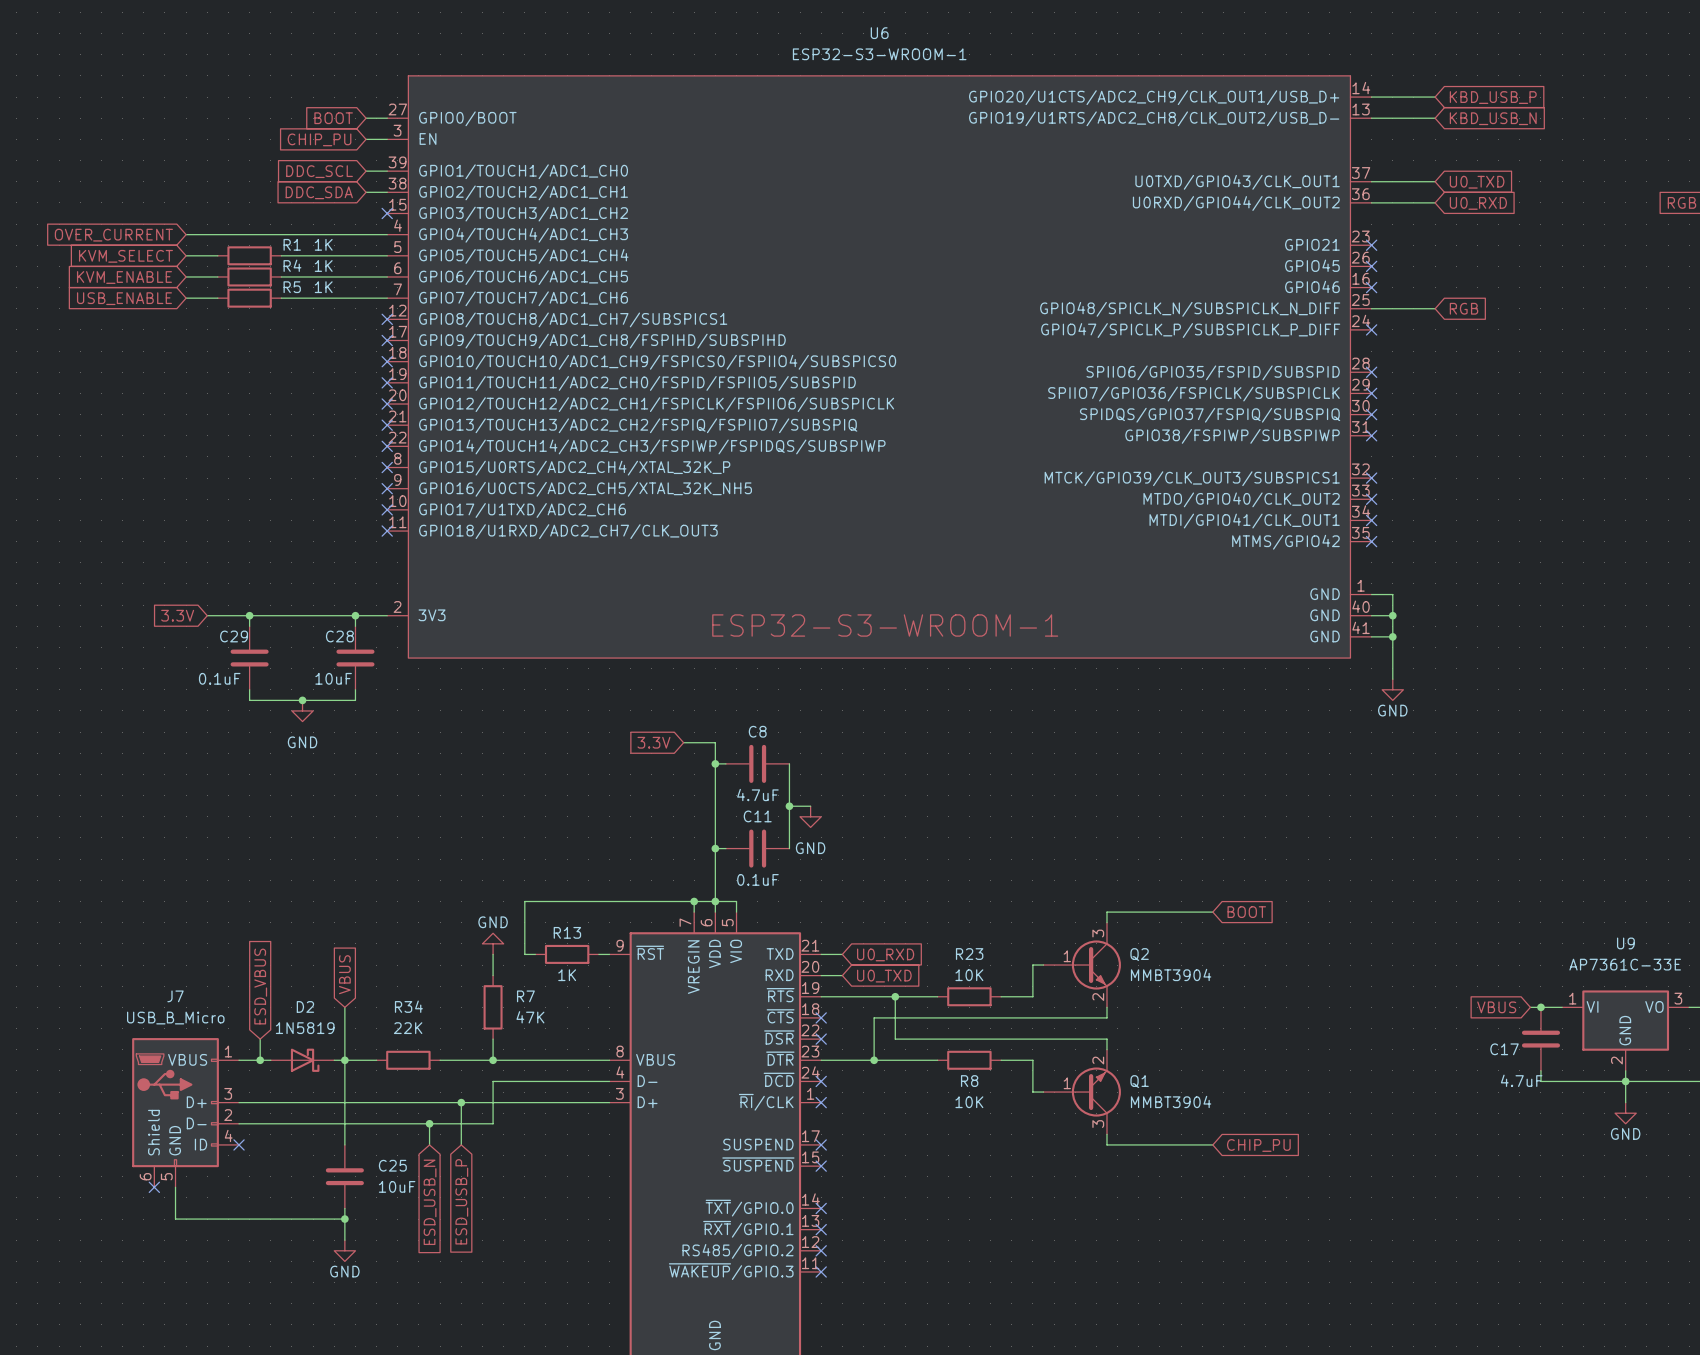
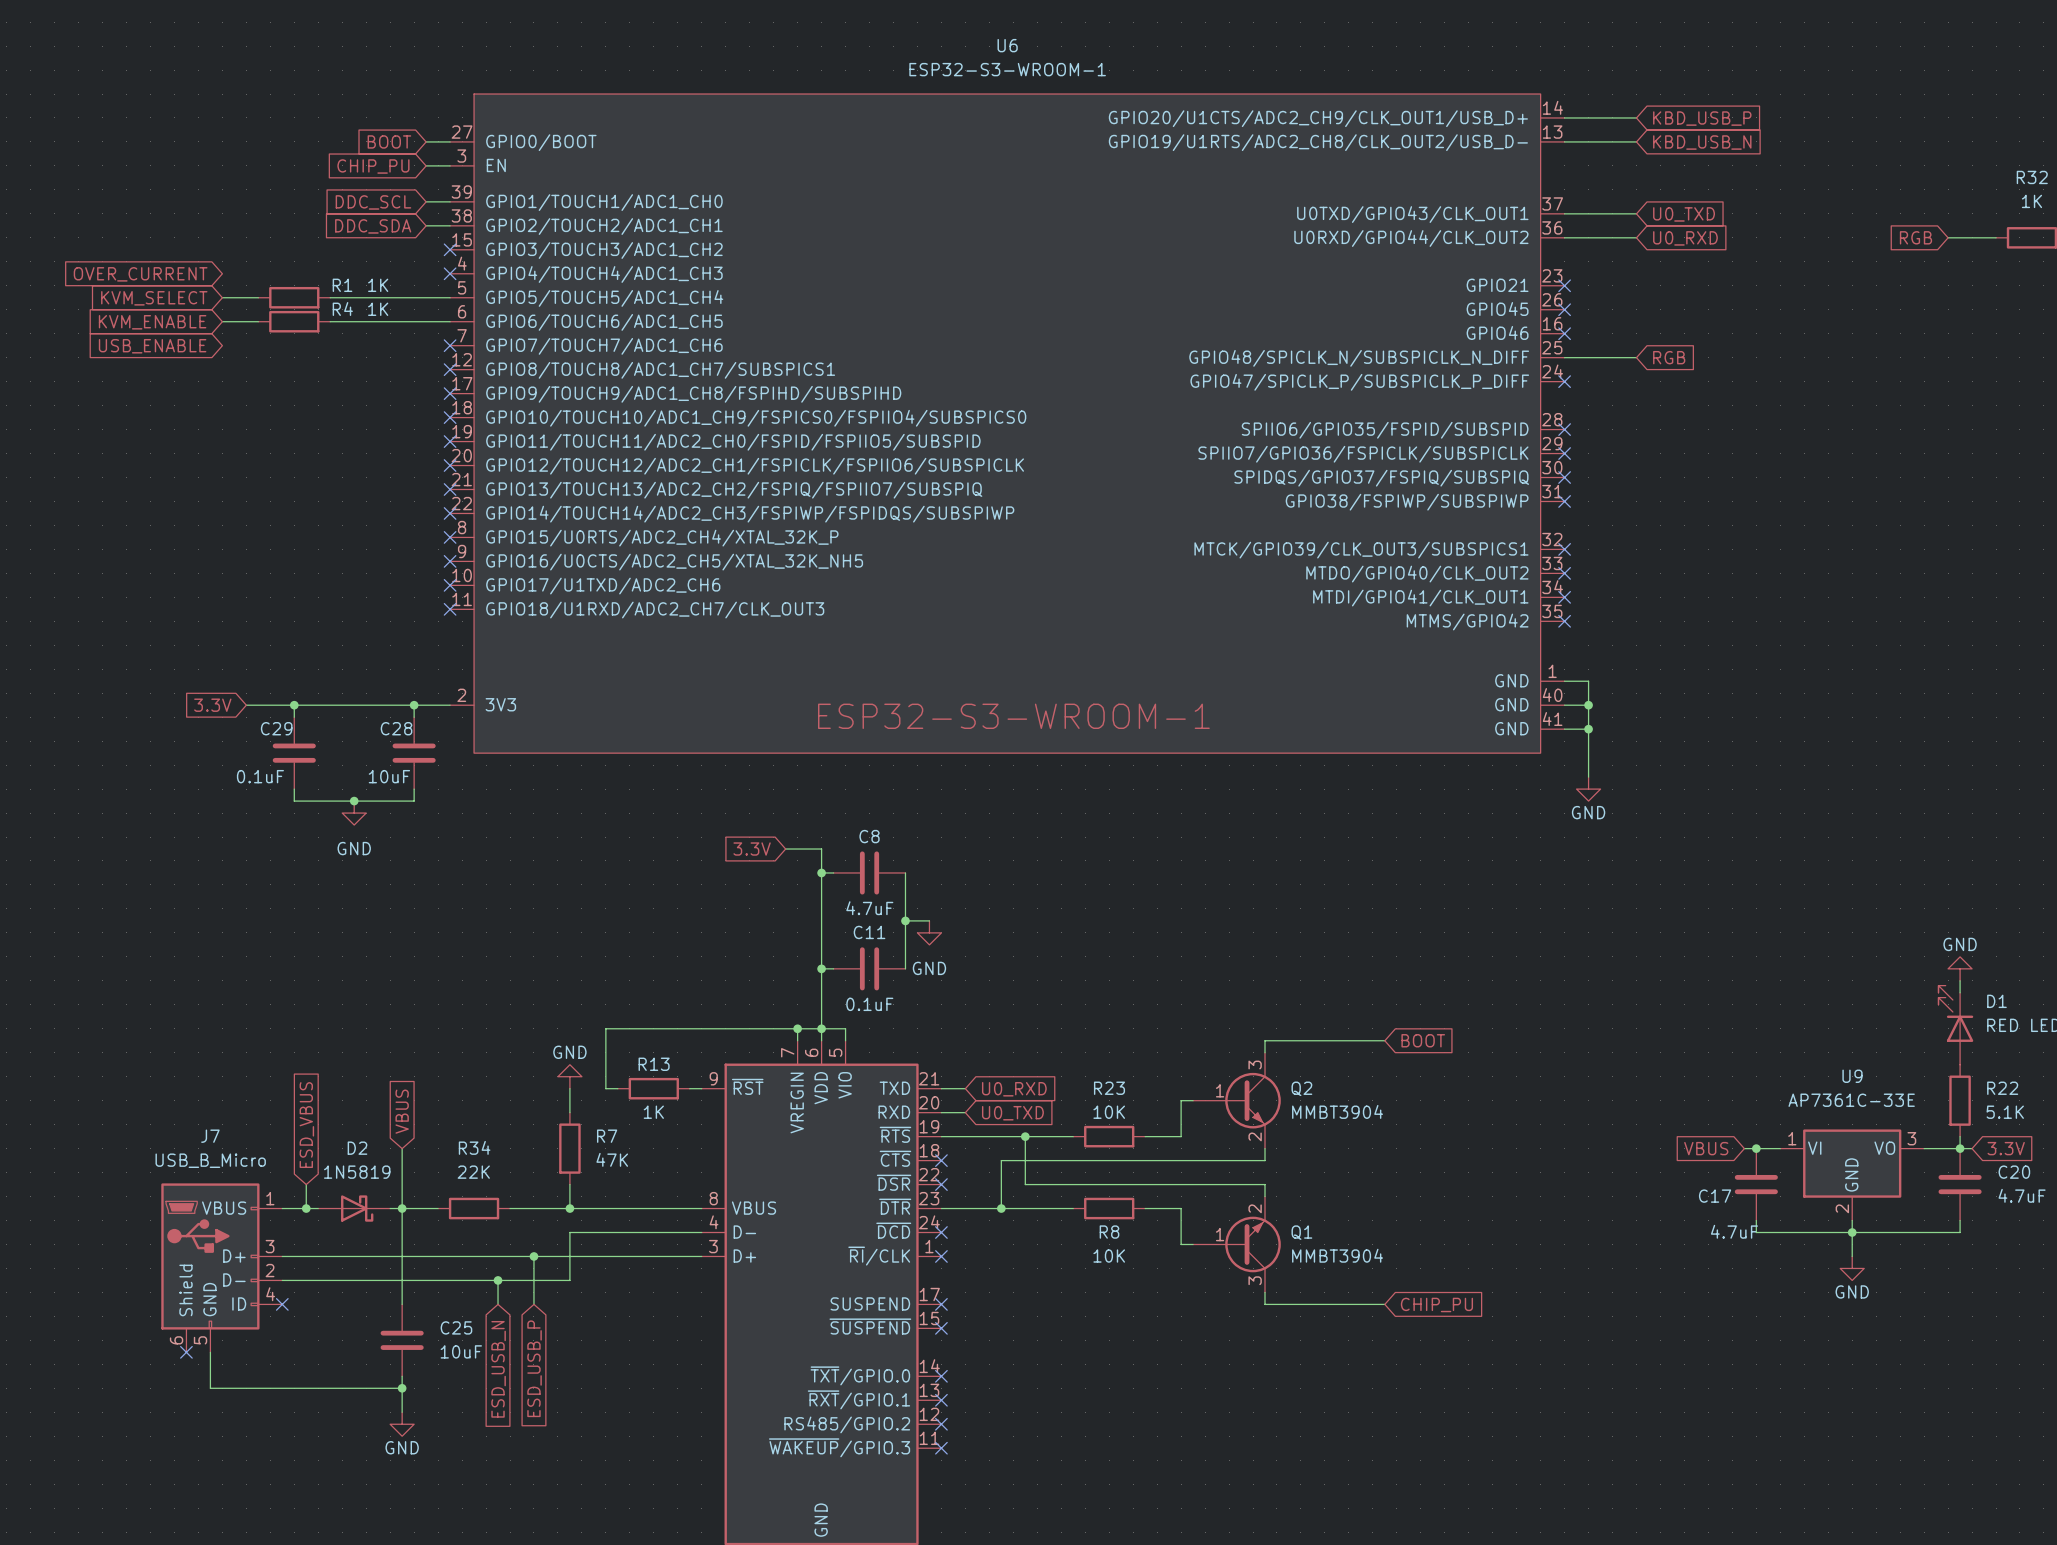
wire: (186, 234) (387, 234) -> none
no-connect mark: none -> (450, 273)
wire: (186, 298) (217, 298) -> none
R5: 1K (249, 298) -> none
wire: (281, 298) (387, 298) -> none
no-connect mark: none -> (450, 345)

